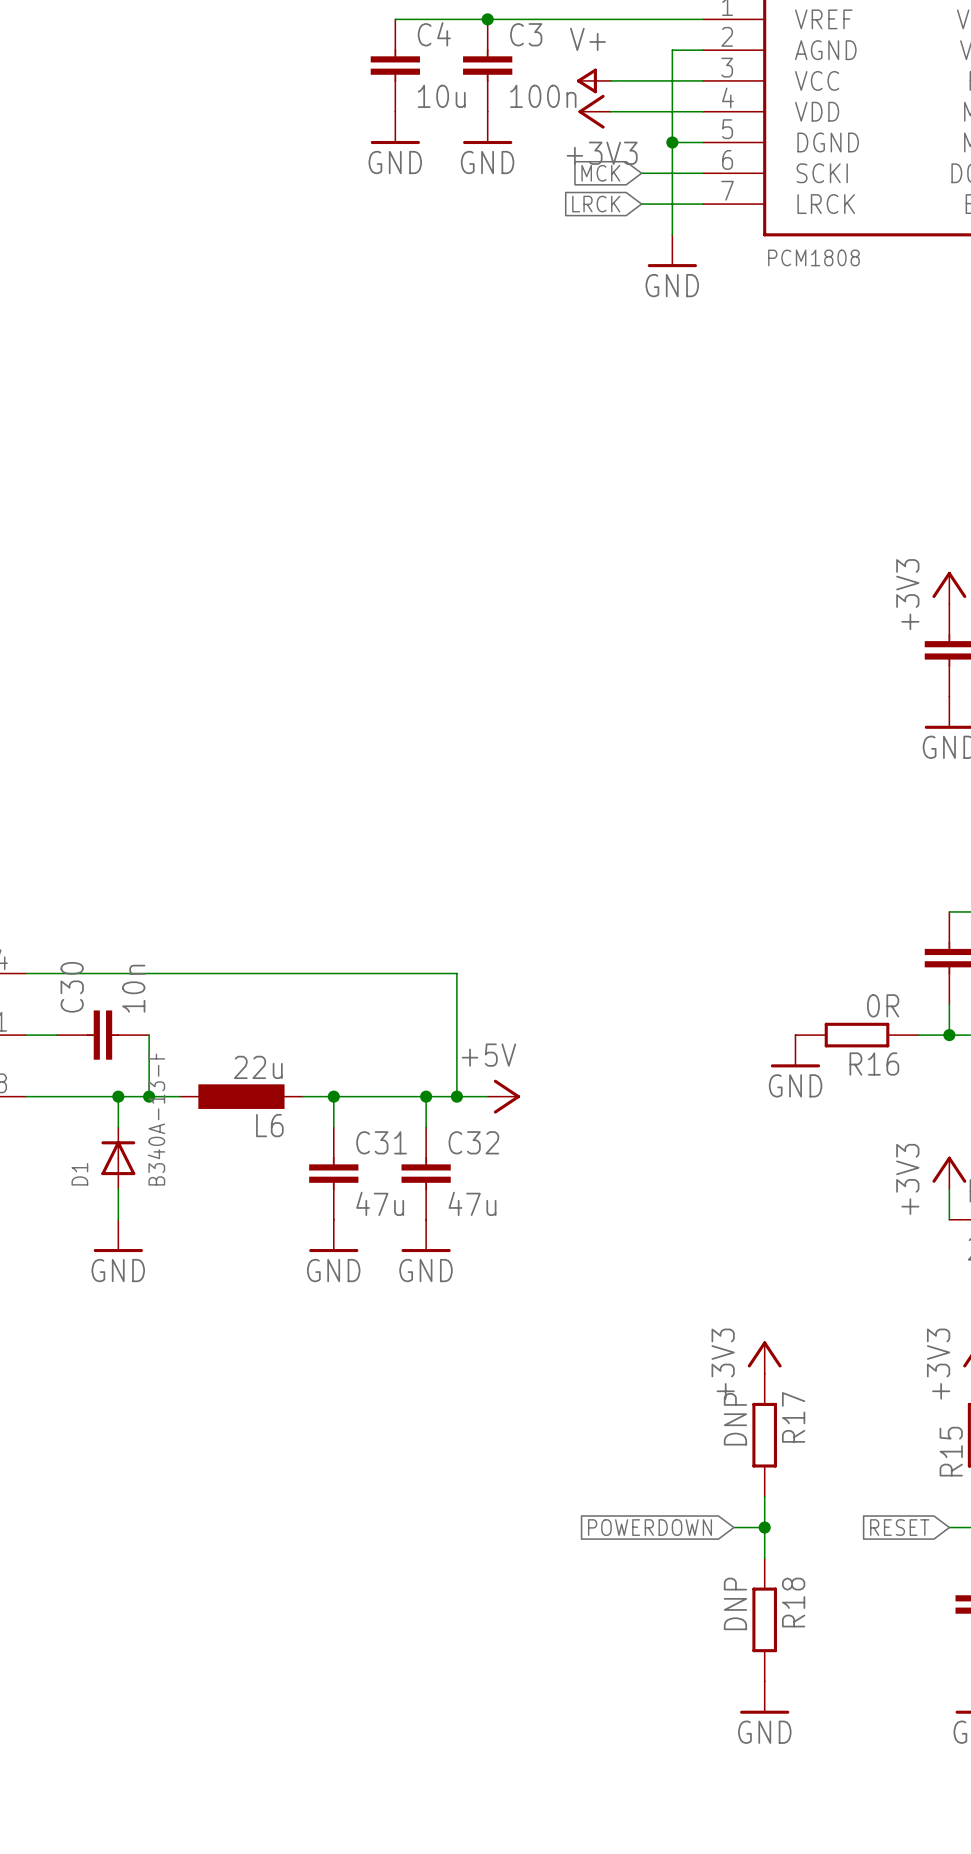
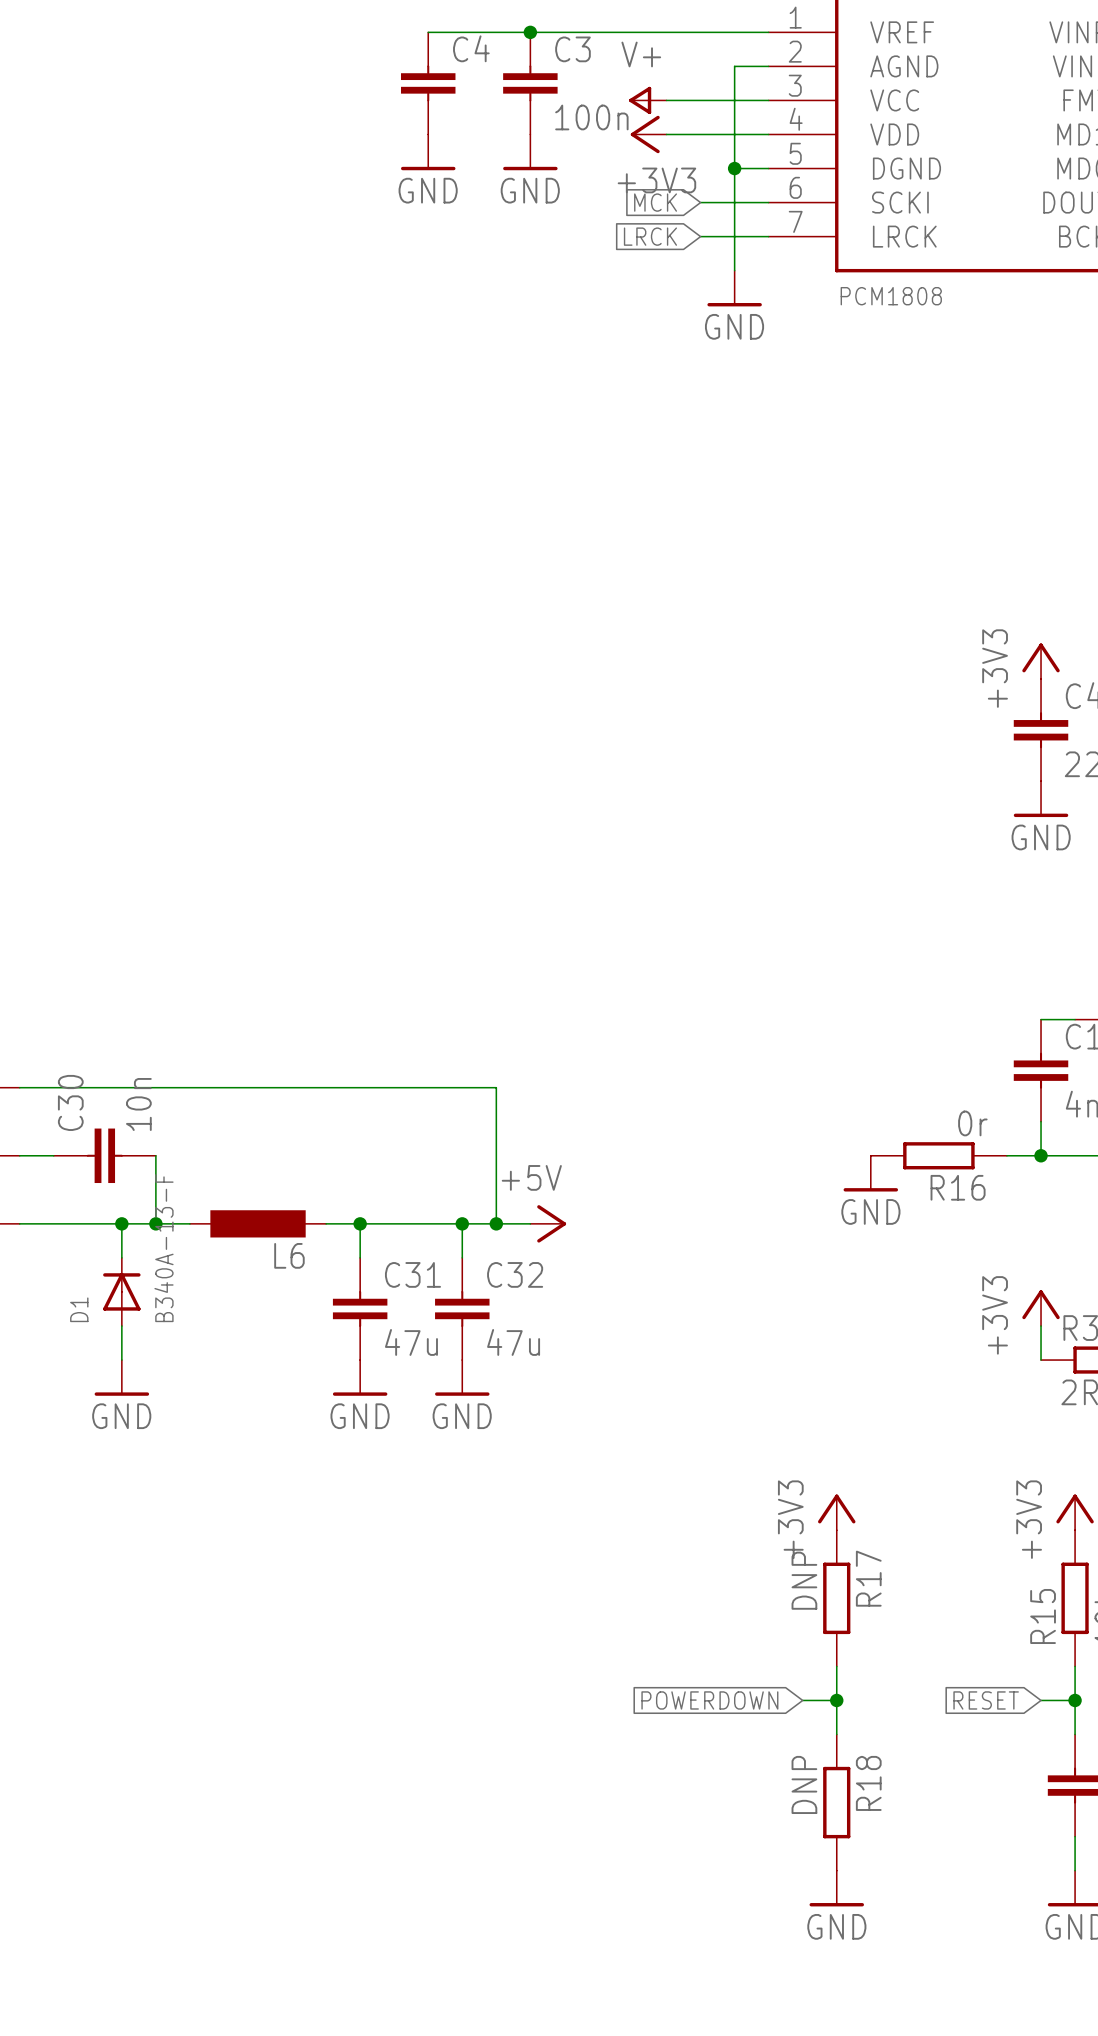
C4 value: 10u (441, 96) -> none
R16 value: 0R (883, 1005) -> 0r (972, 1123)
L6 value: 22u (258, 1067) -> none

